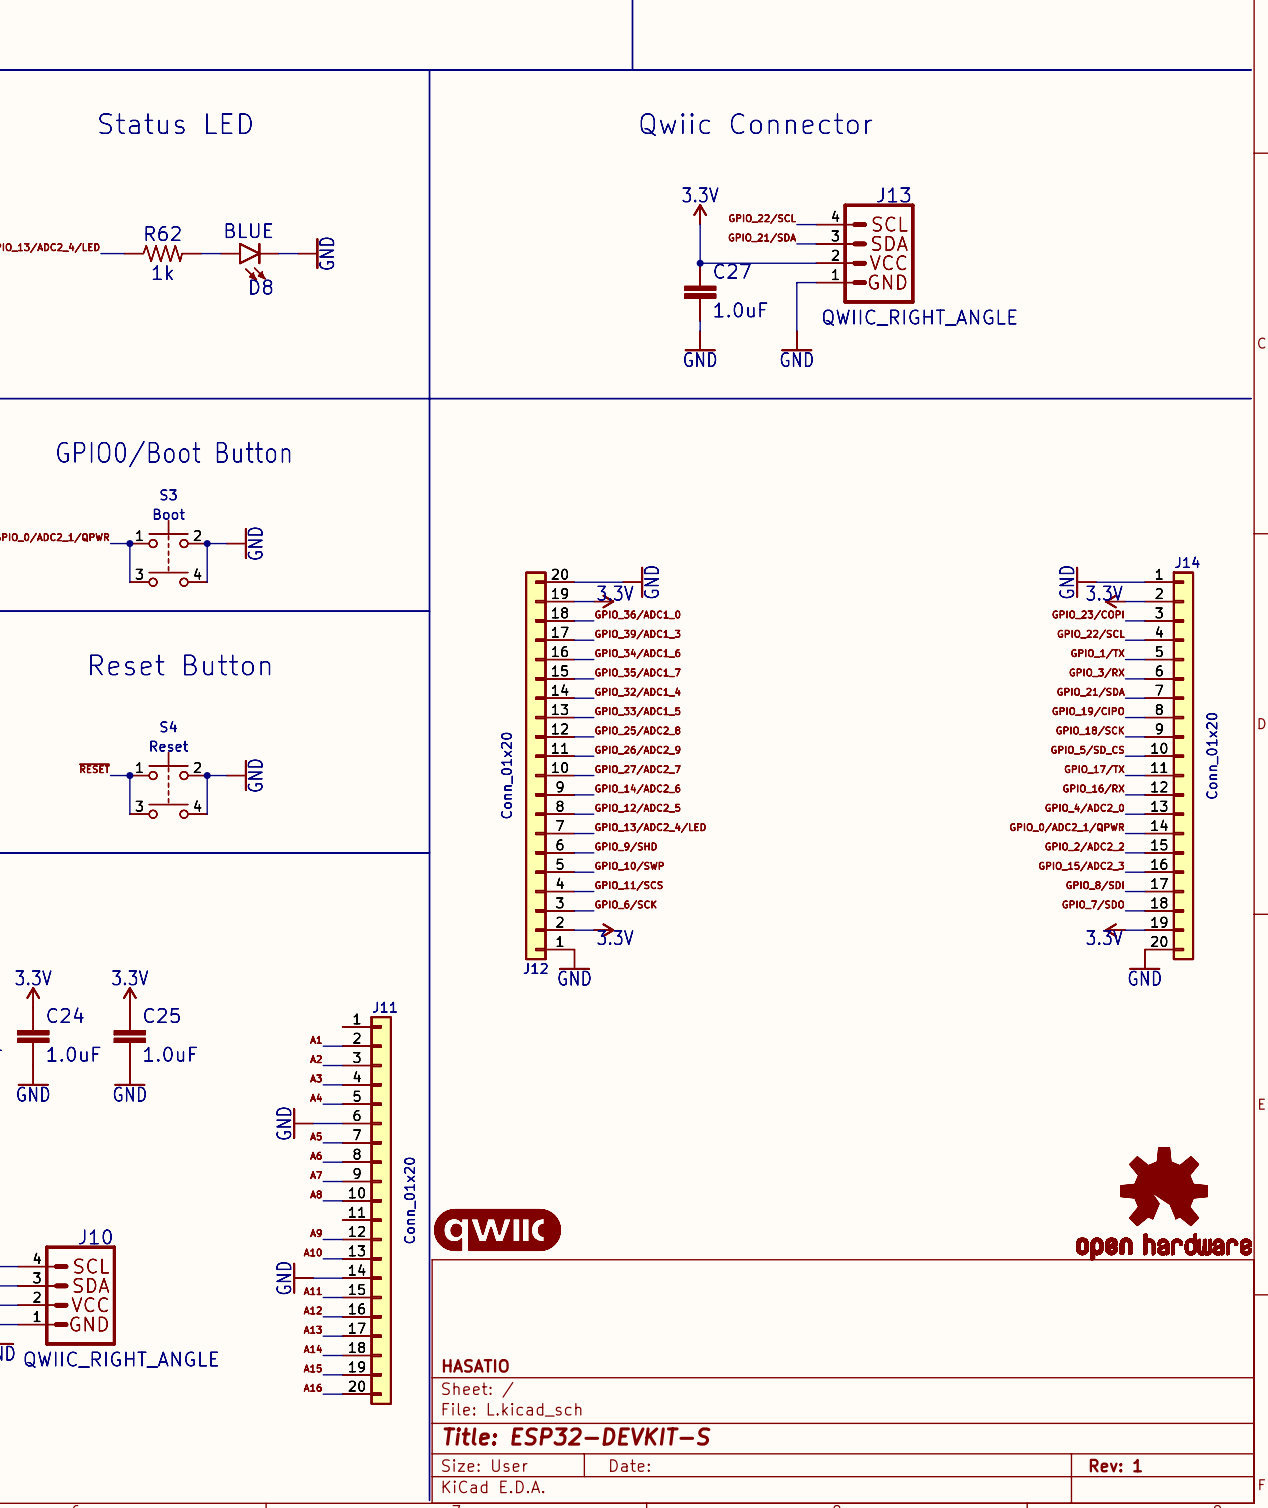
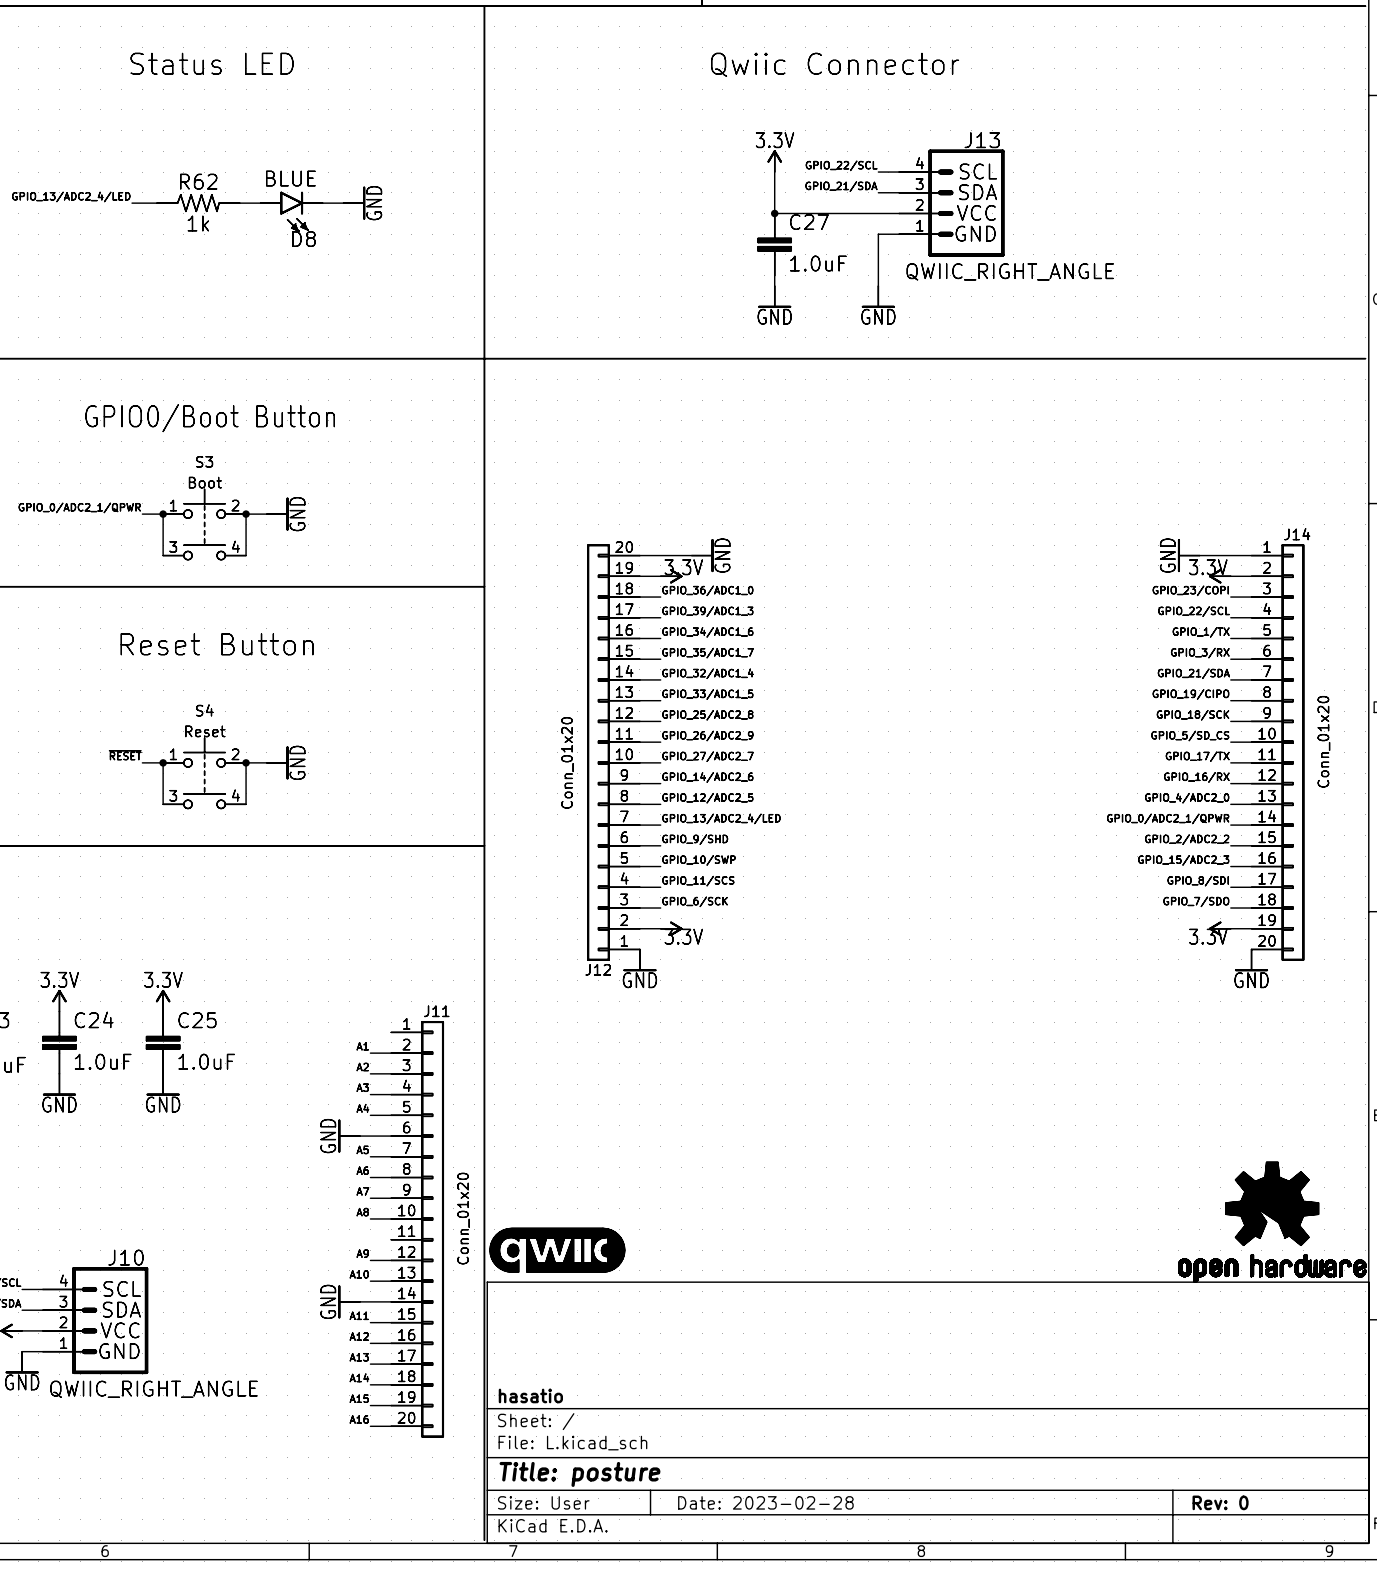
title block: HASATIO (475, 1365) -> hasatio (530, 1395)
title block: Title: ESP32-DEVKIT-S (576, 1436) -> Title: posture (579, 1474)
title block: Date: (629, 1465) -> Date: 2023-02-28 (765, 1502)
title block: Rev: 1 (1115, 1465) -> Rev: 0 (1220, 1502)

